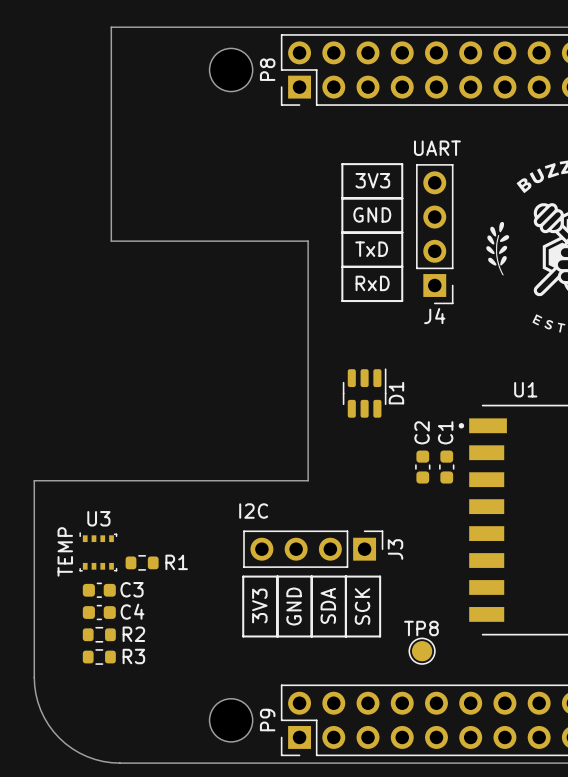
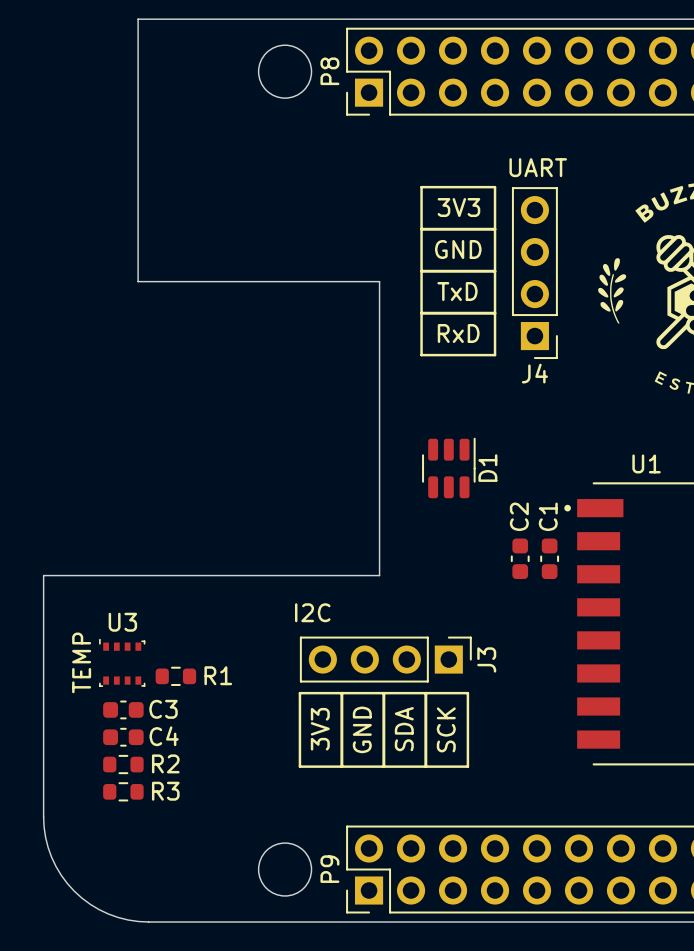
TP8: (422, 651) -> none

